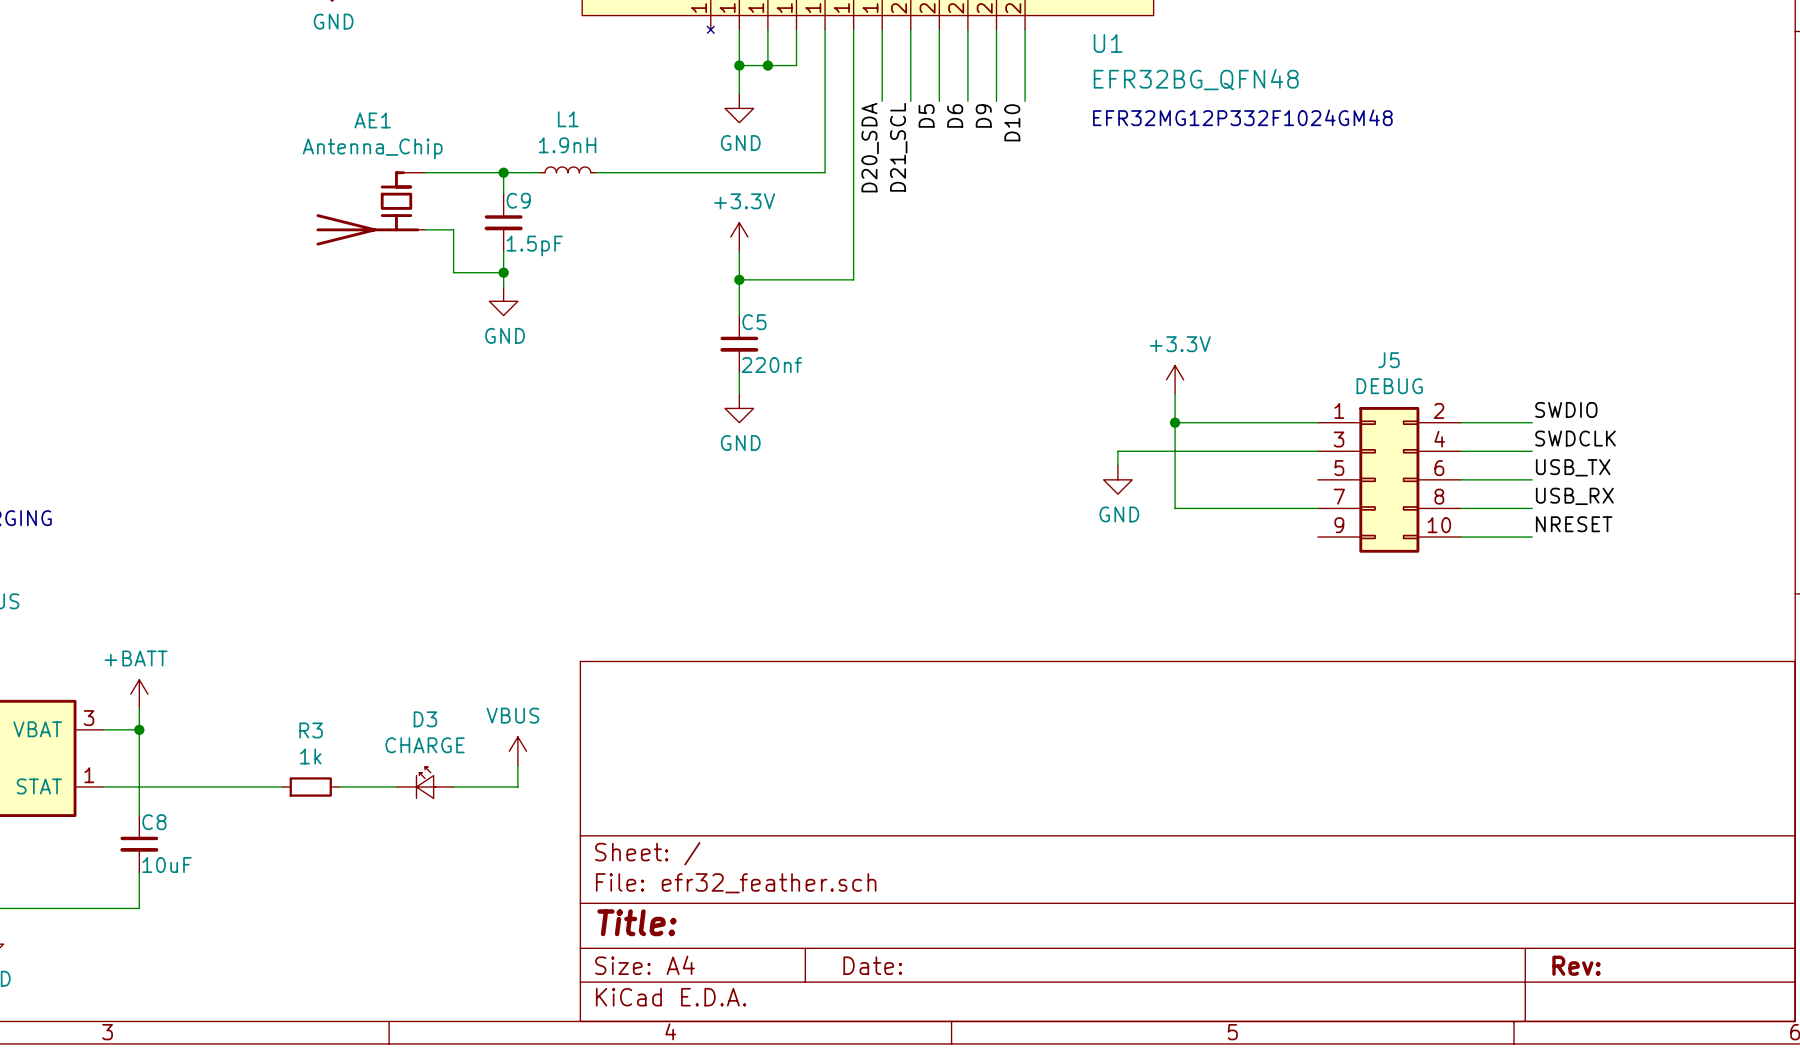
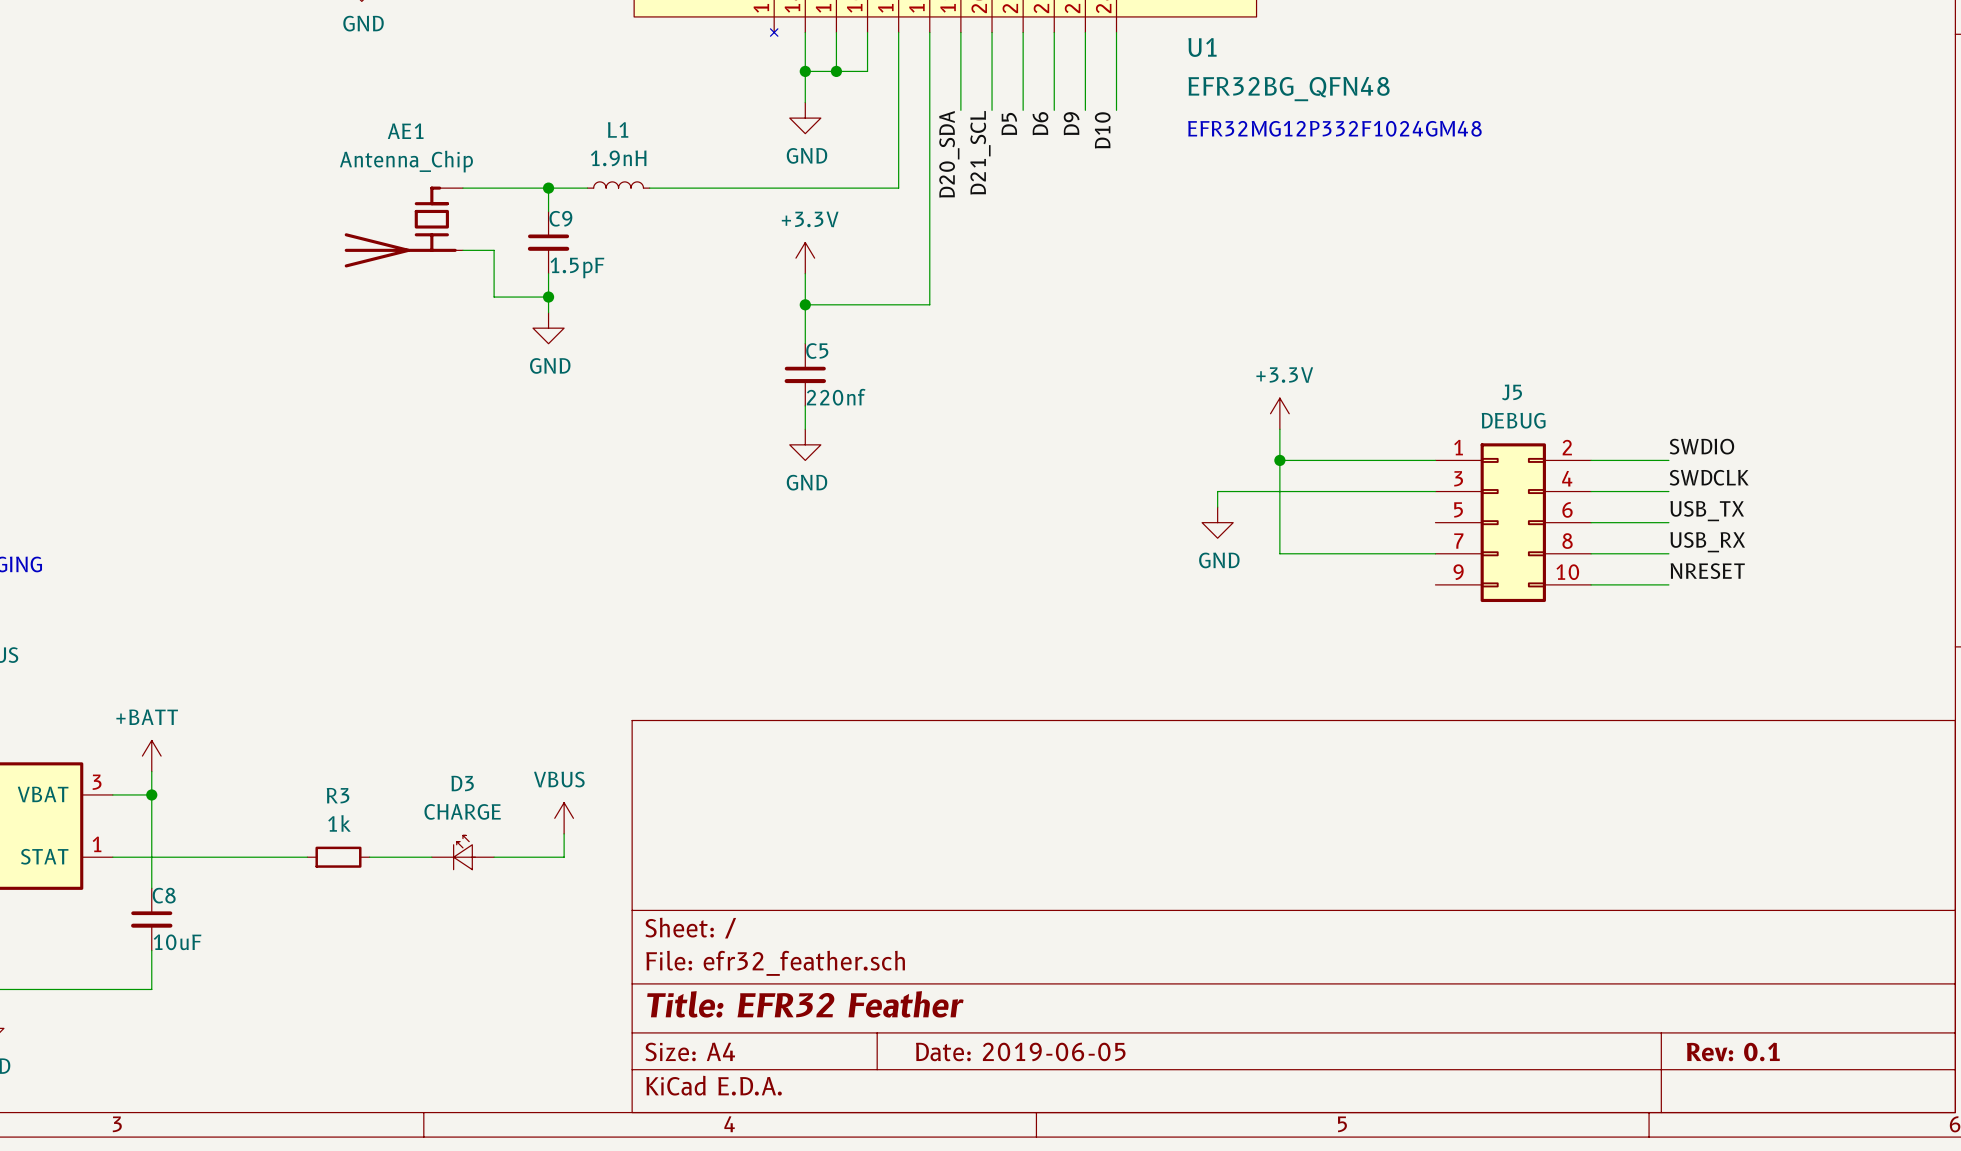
title block: Title: (636, 922) -> Title: EFR32 Feather (805, 1004)
title block: Date: (872, 965) -> Date: 2019-06-05 (1020, 1051)
title block: Rev: (1576, 965) -> Rev: 0.1 (1733, 1052)

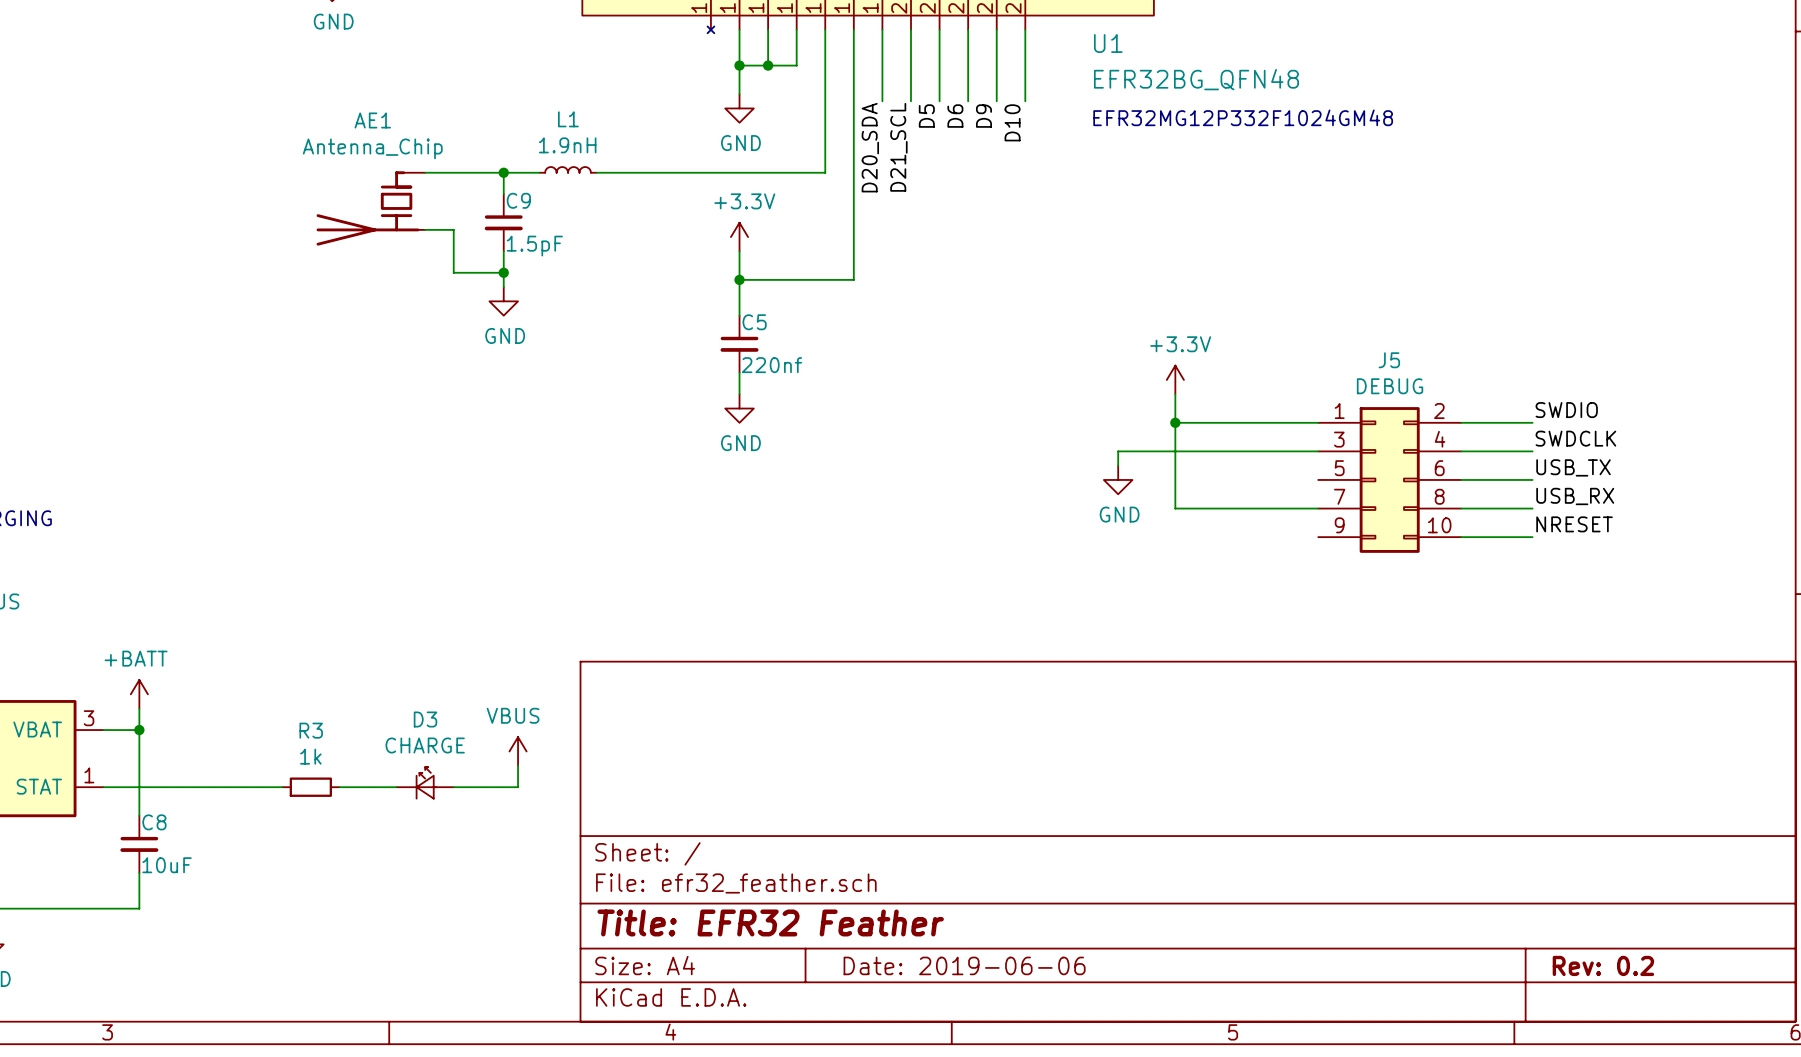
title block: Date: 2019-06-05 (1020, 1051) -> Date: 2019-06-06 (964, 965)
title block: Rev: 0.1 (1733, 1052) -> Rev: 0.2 (1603, 965)

